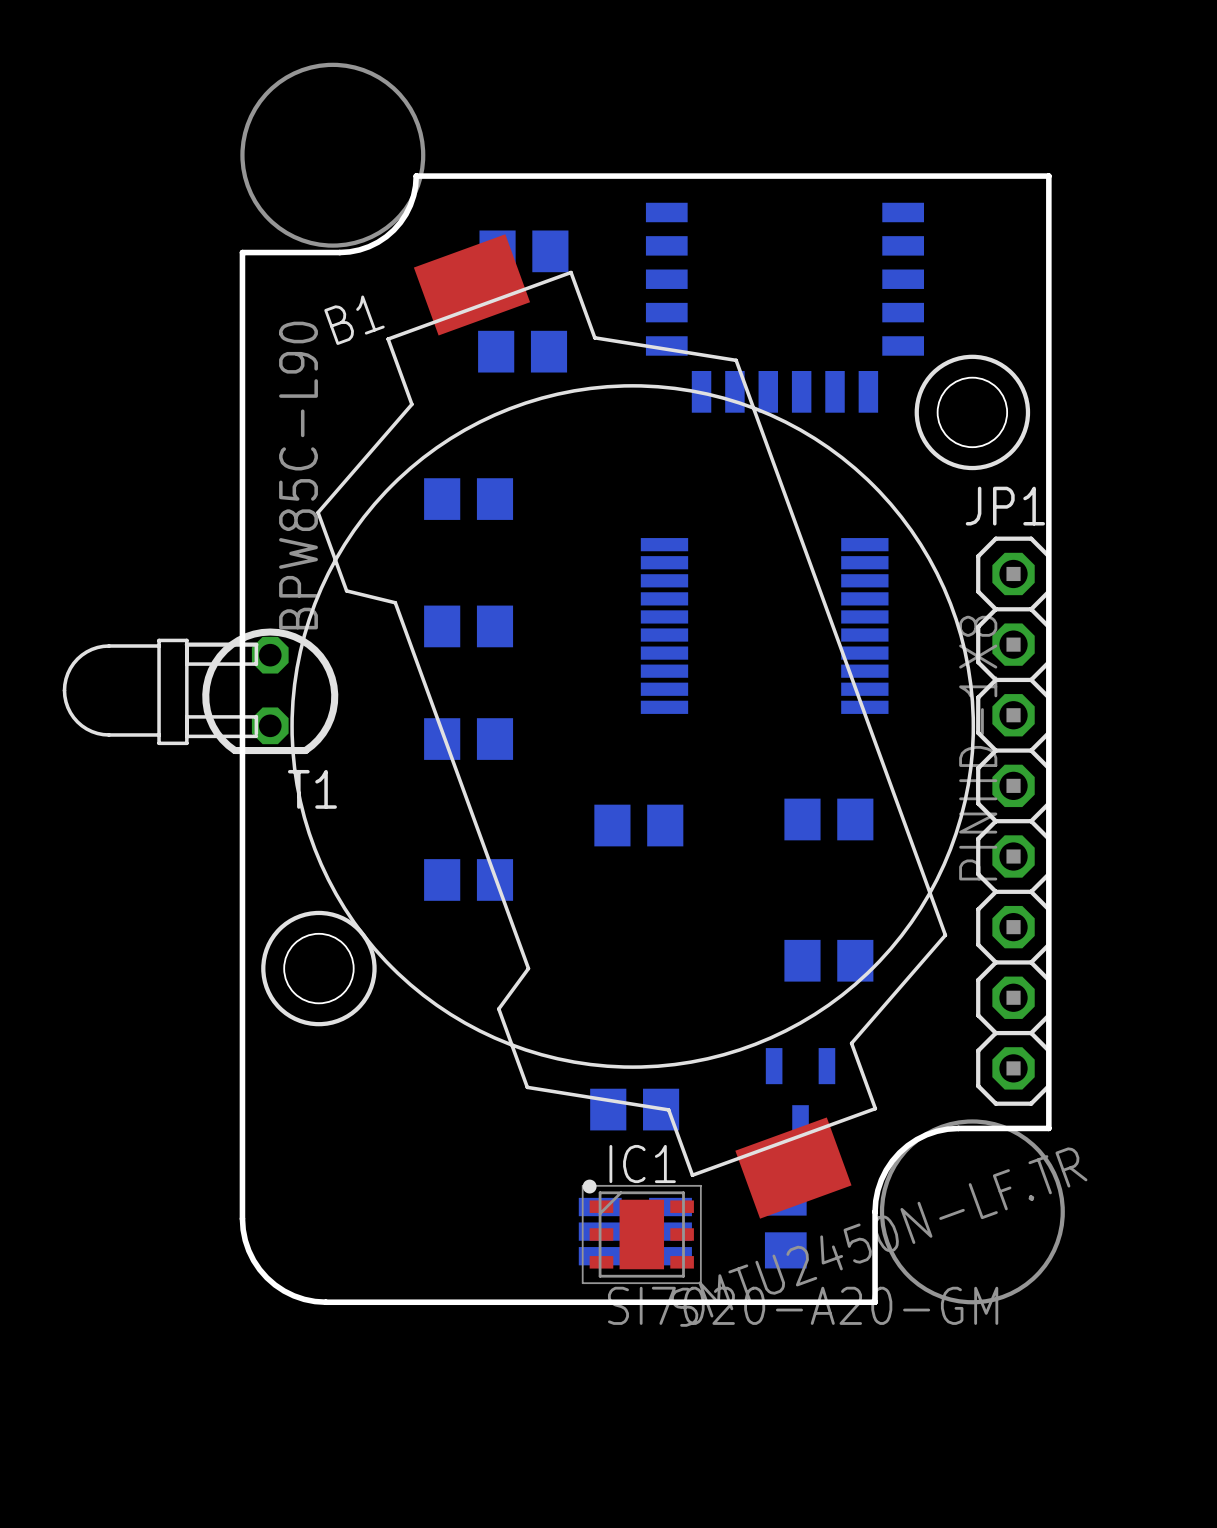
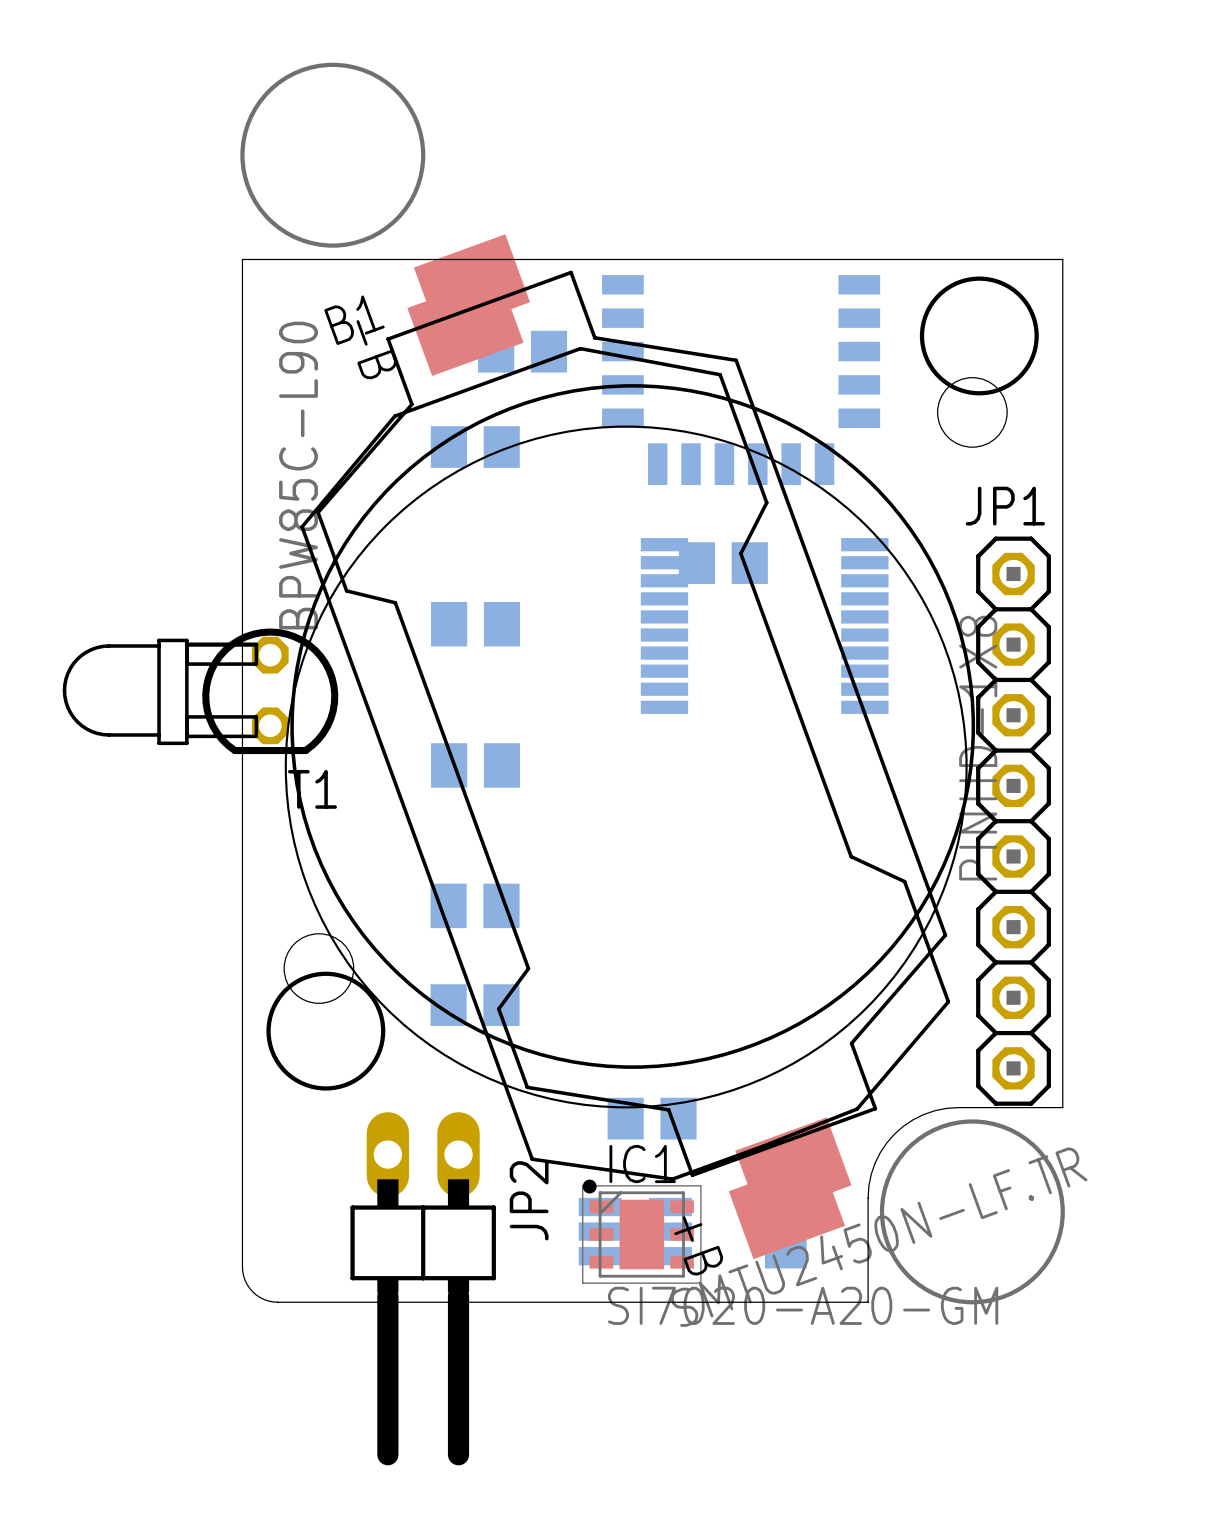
part: (523, 251) -> none
board edge: (242, 259) (242, 252) (339, 252) (369, 246) (386, 236) (406, 214) (413, 195) (416, 176) (1048, 176) (1048, 1128) (947, 1129) (916, 1139) (899, 1152) (886, 1170) (877, 1190) (875, 1211) (875, 1302) (868, 1302) -> (242, 259) (1062, 259) (1062, 1107) (946, 1108) (935, 1110) (913, 1119) (894, 1134) (880, 1152) (871, 1174) (868, 1186) (868, 1302)
board edge width: thick (242, 259) (242, 1218) -> thin (242, 259) (242, 1218)
drawing: none -> [919, 276, 1039, 396]
part position: (784, 307) -> (741, 380)
drawing: [914, 354, 1031, 471] -> none
part position: (468, 499) -> (475, 447)
part: none -> (723, 563)
part footprint: [424, 605, 514, 648] -> [431, 601, 521, 647]
part footprint: [424, 718, 514, 760] -> [431, 743, 521, 788]
part: none -> (626, 766)
part: (828, 819) -> none
part: (638, 825) -> none
part footprint: [424, 859, 514, 901] -> [430, 883, 520, 929]
drawing: [261, 910, 377, 1027] -> none
part: (828, 960) -> none
drawing: none -> [266, 971, 386, 1091]
part: none -> (475, 1005)
part: (800, 1094) -> none
part position: (634, 1109) -> (652, 1118)
board edge: (242, 1218) (248, 1250) (266, 1277) (293, 1295) (325, 1302) -> (242, 1218) (242, 1271) (247, 1284) (252, 1291) (260, 1297) (273, 1301) (325, 1302)
JP2: none -> (423, 1288)
board edge width: thick (325, 1302) (868, 1302) -> thin (325, 1302) (868, 1302)

